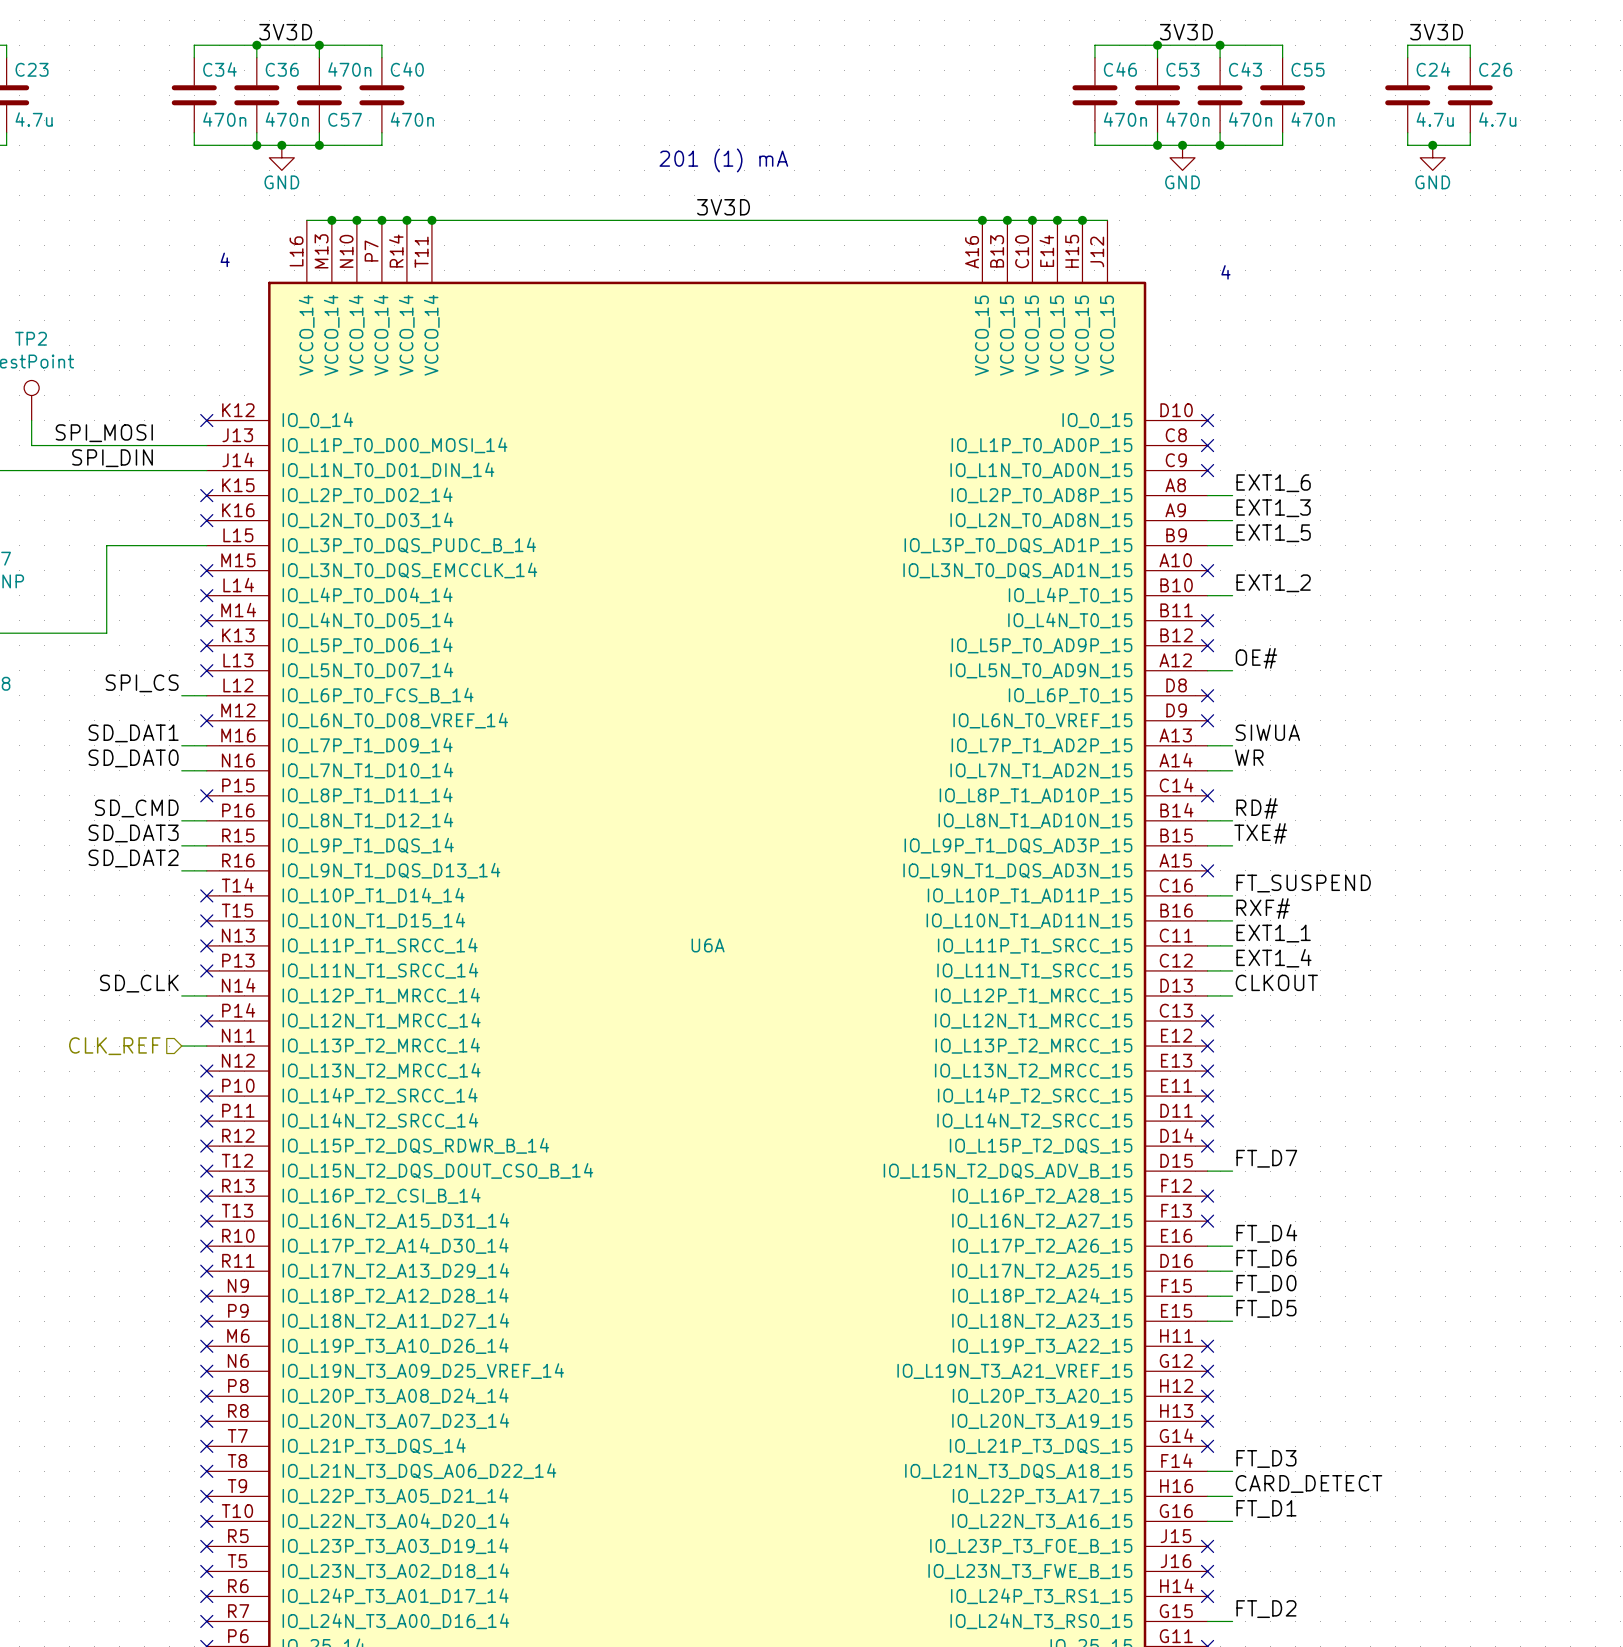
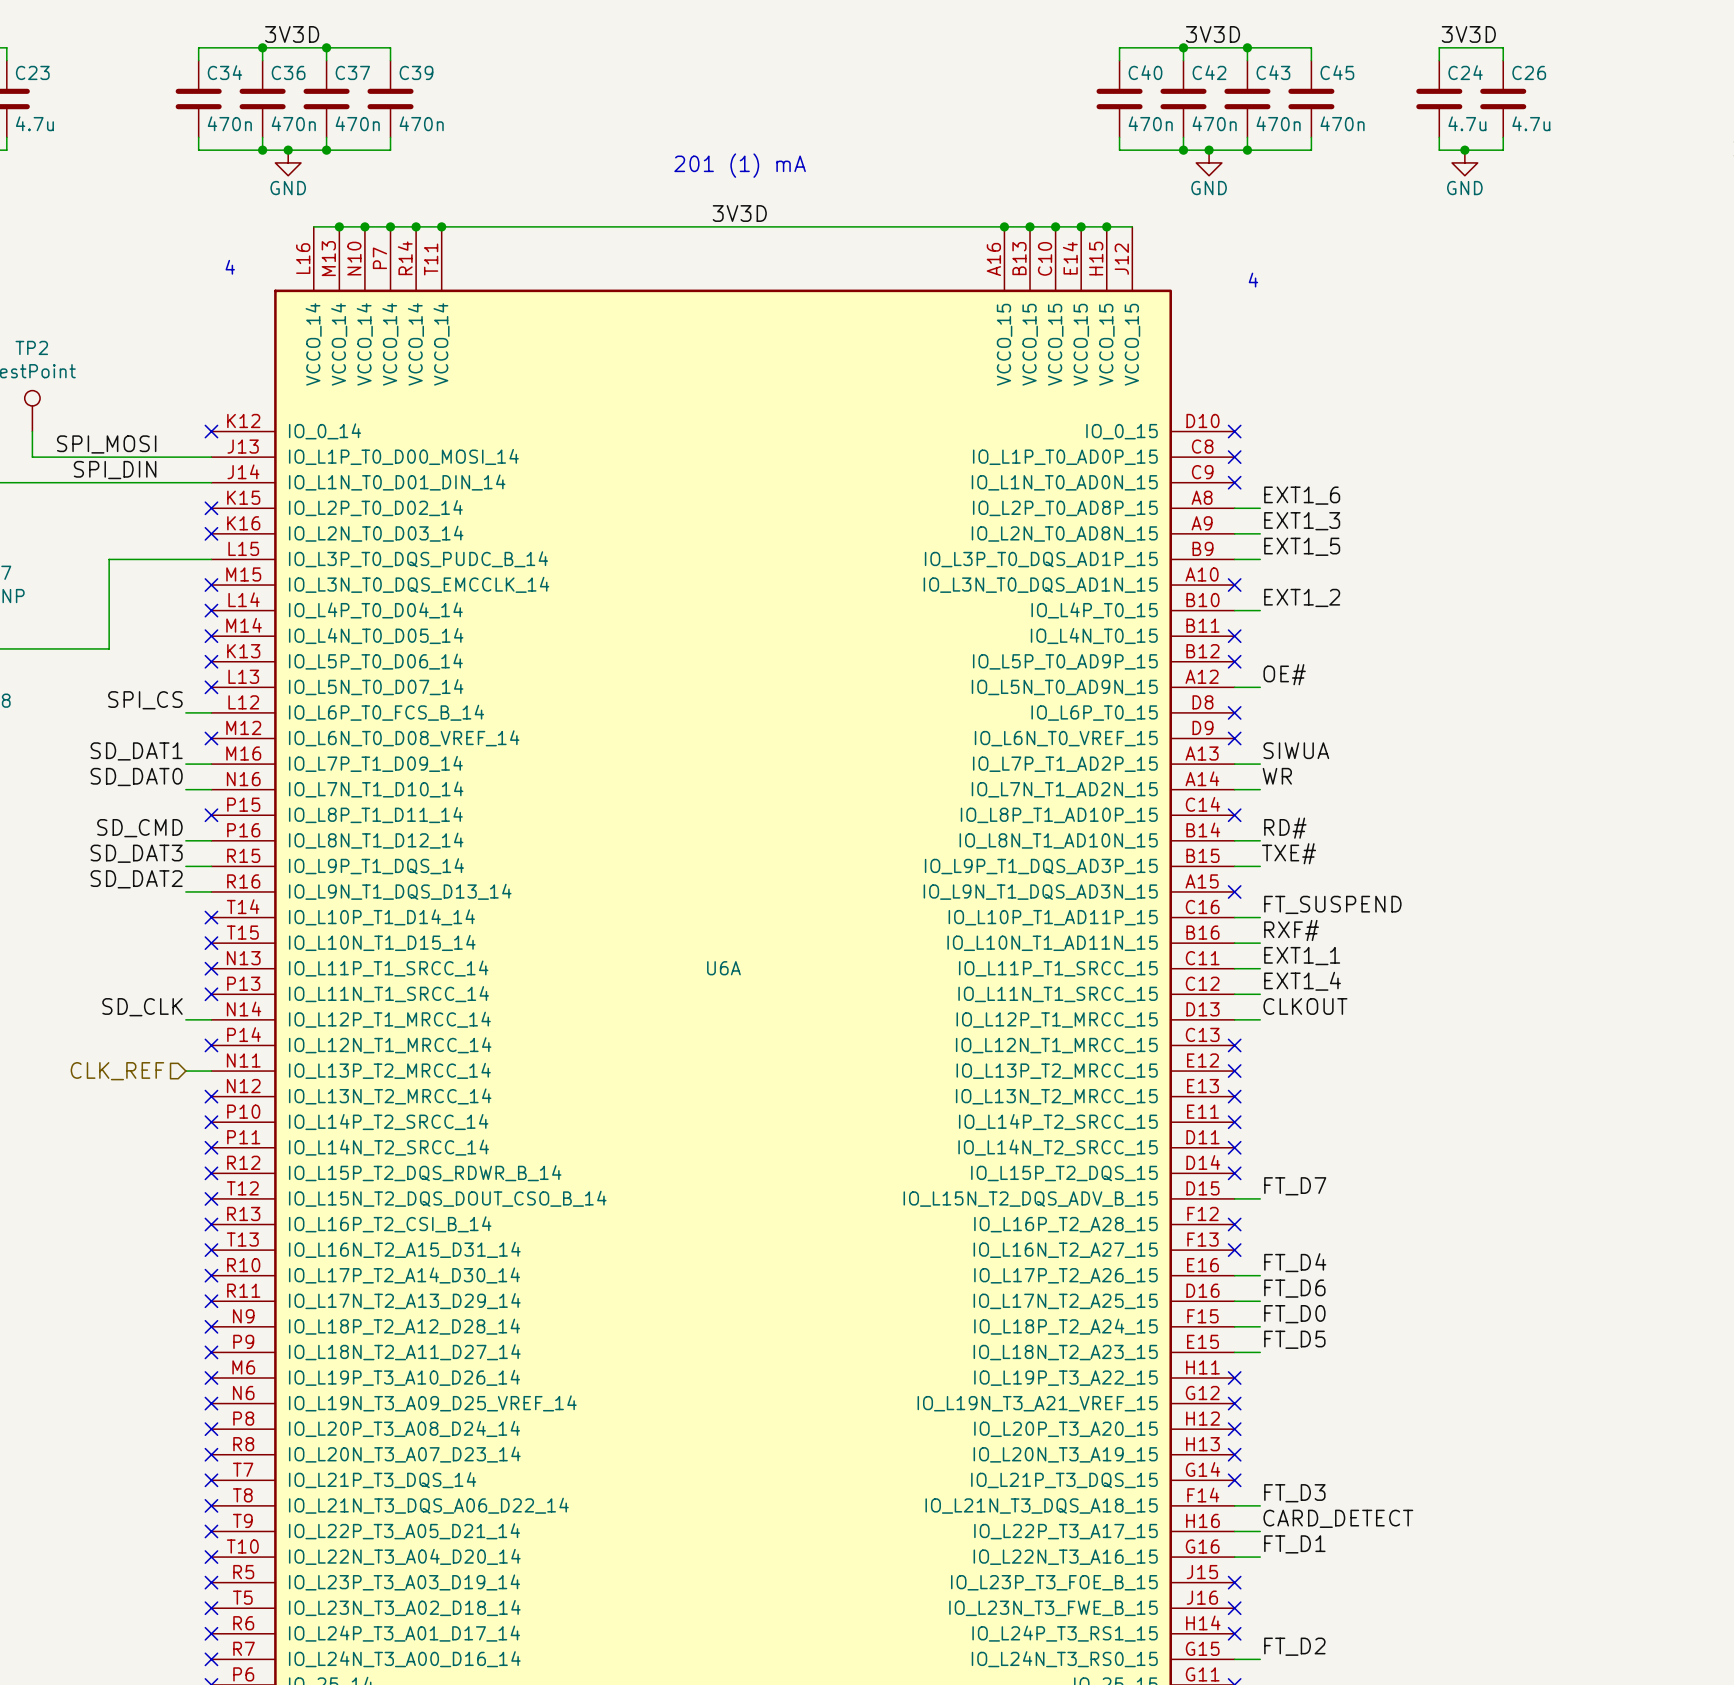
C57 value position: 470n (349, 69) -> 470n (357, 123)
C40 name: C40 (407, 69) -> C39 (416, 72)
C46 name: C46 (1120, 69) -> C40 (1145, 72)
C53 name: C53 (1182, 69) -> C42 (1209, 72)
C55 name: C55 (1308, 69) -> C45 (1337, 72)
C57 name: C57 (345, 119) -> C37 (352, 72)

